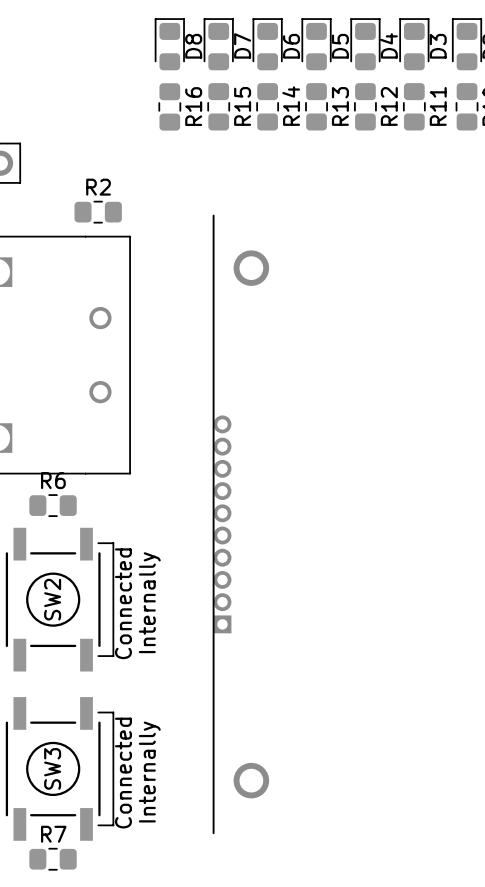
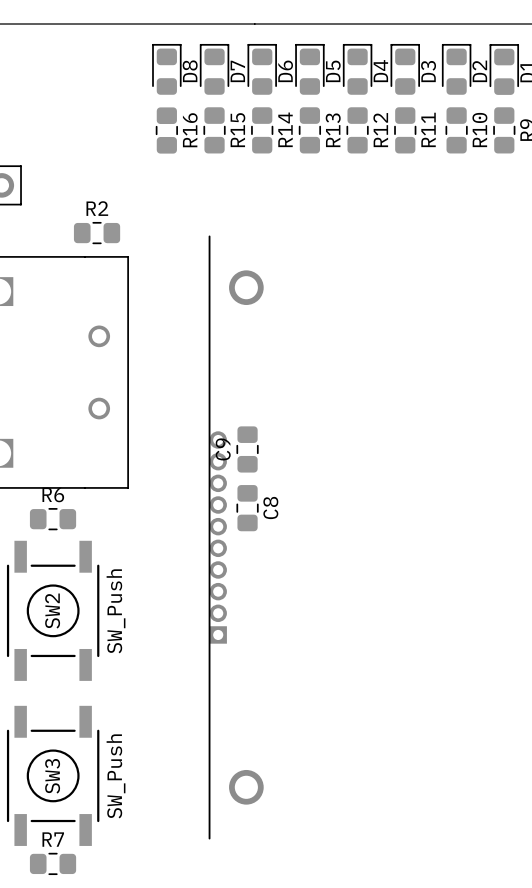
C9: none -> (247, 449)
C8: none -> (247, 508)
line: (98, 543) (113, 543) (113, 656) (98, 656) -> none
SW2 value: none -> SW_Push (116, 611)
text: Internally (149, 602) -> none
text: Connected (123, 603) -> none
line: (98, 712) (113, 712) (113, 825) (98, 825) -> none
SW3 value: none -> SW_Push (116, 776)
text: Internally (149, 772) -> none
text: Connected (123, 773) -> none

